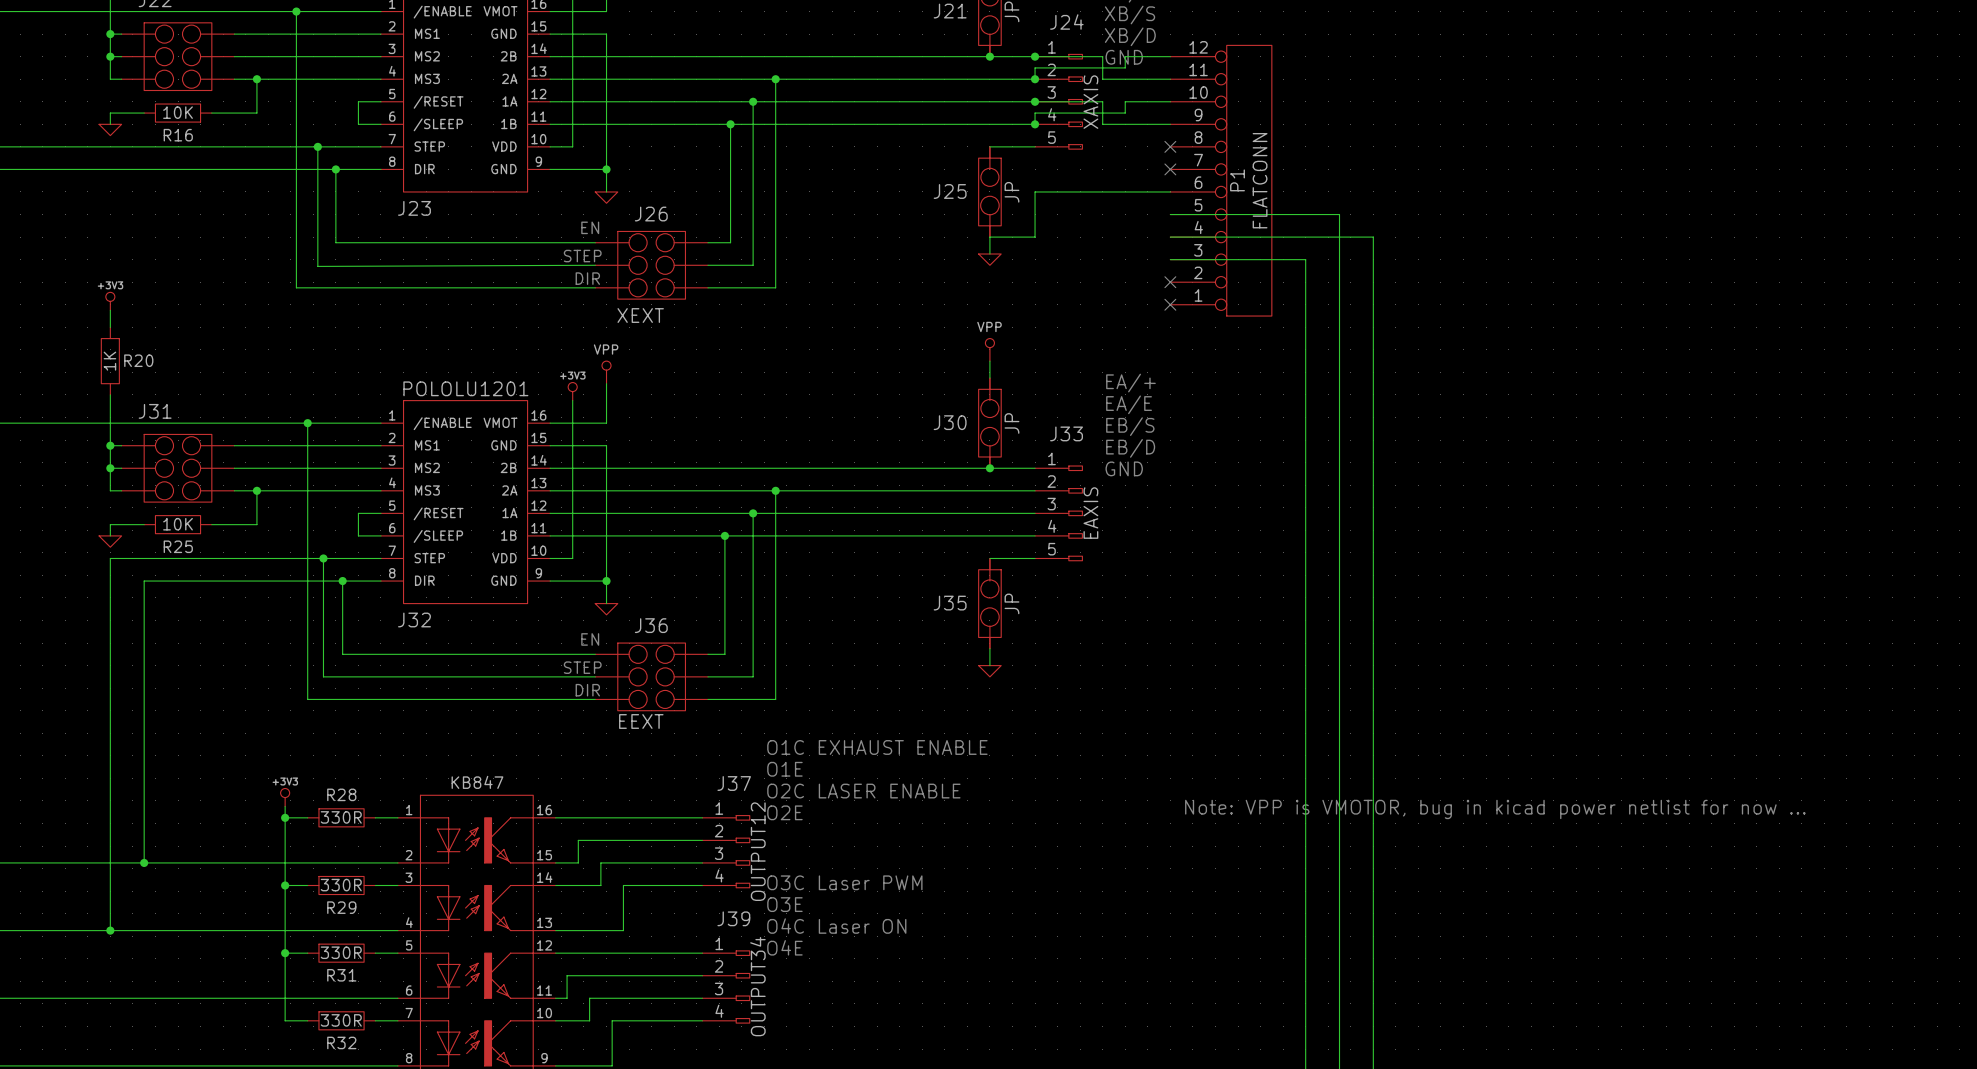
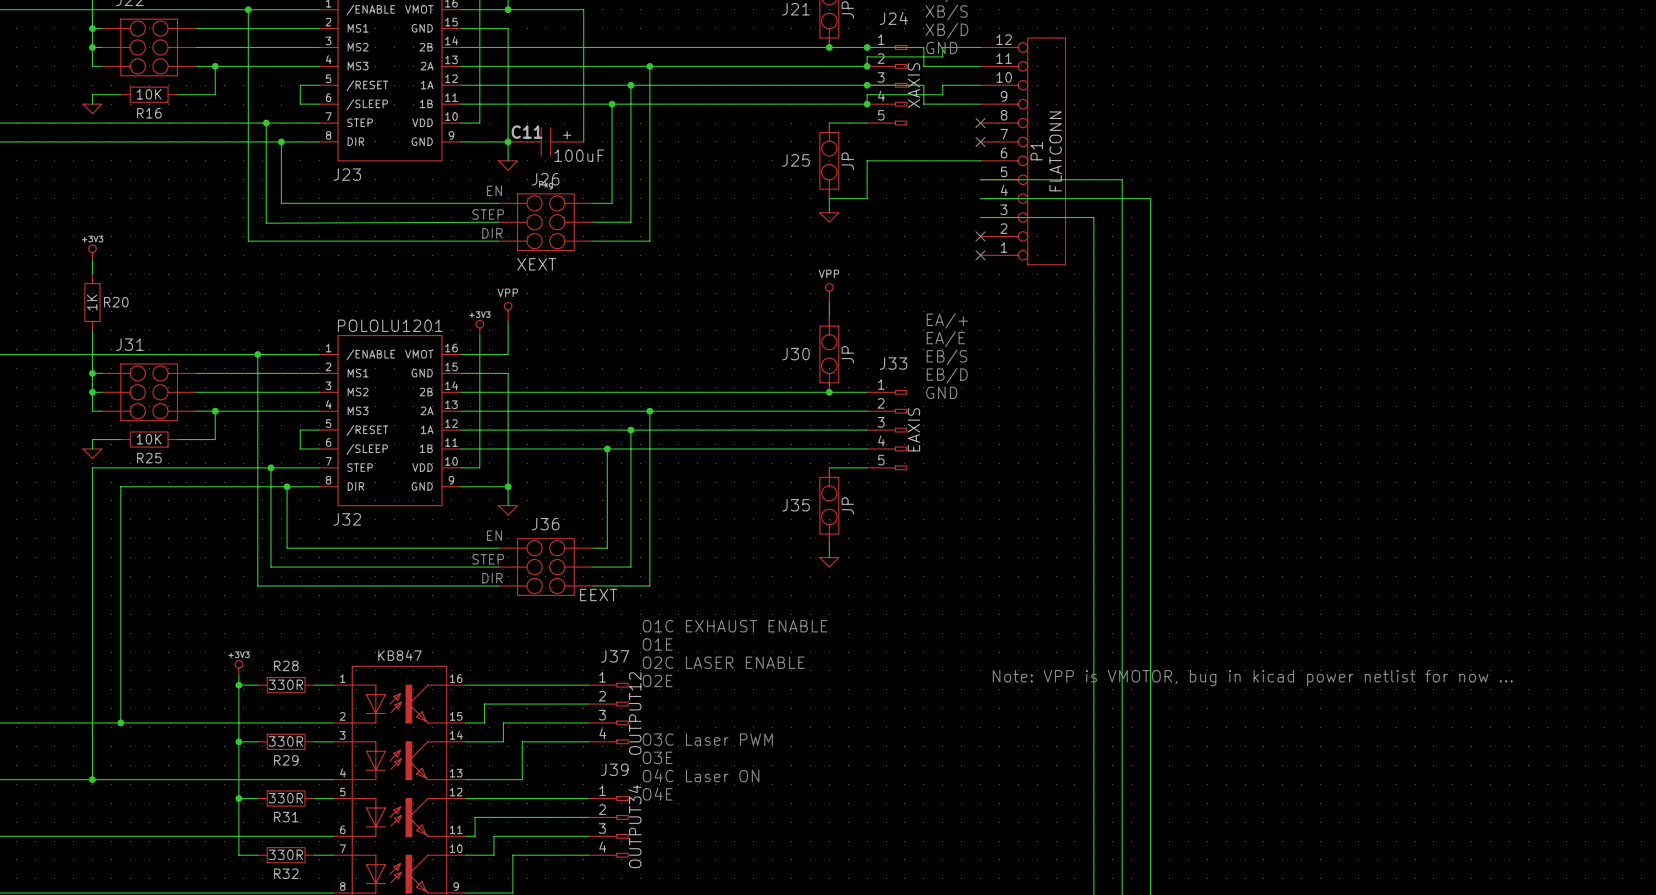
wire: none -> (508, 9) (583, 9) (583, 141)
junction: none -> (508, 9)
C11: none -> 100uF (545, 141)
J36 value position: EEXT (641, 721) -> EEXT (598, 594)

